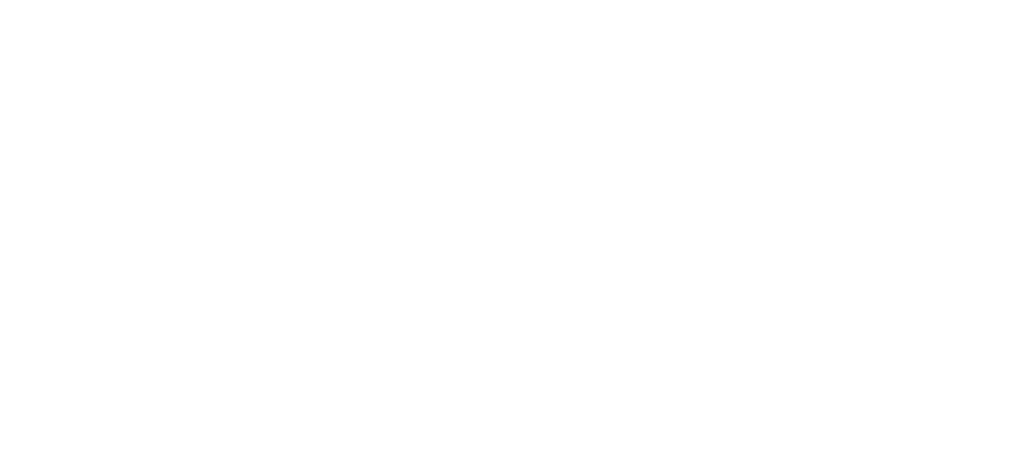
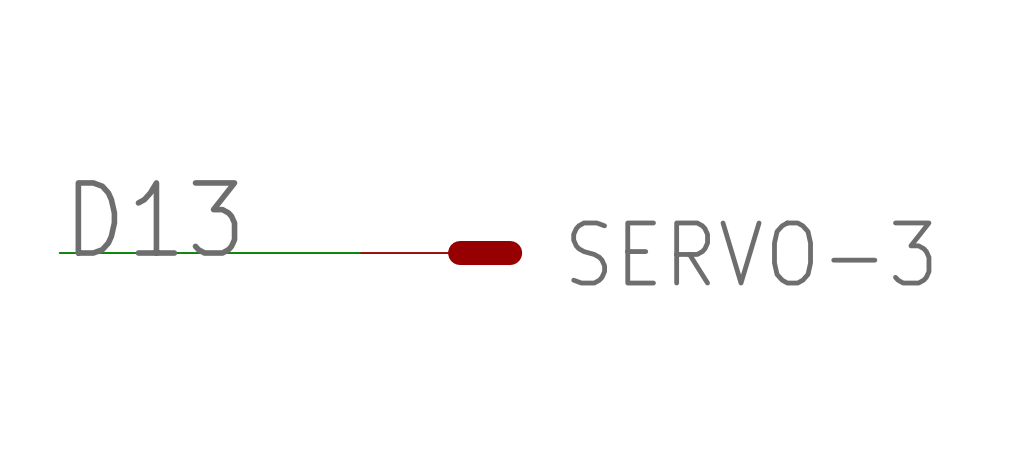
label: none -> D13 (156, 217)
wire: none -> (59, 253) (359, 253)
SERVO-3: none -> (441, 253)

